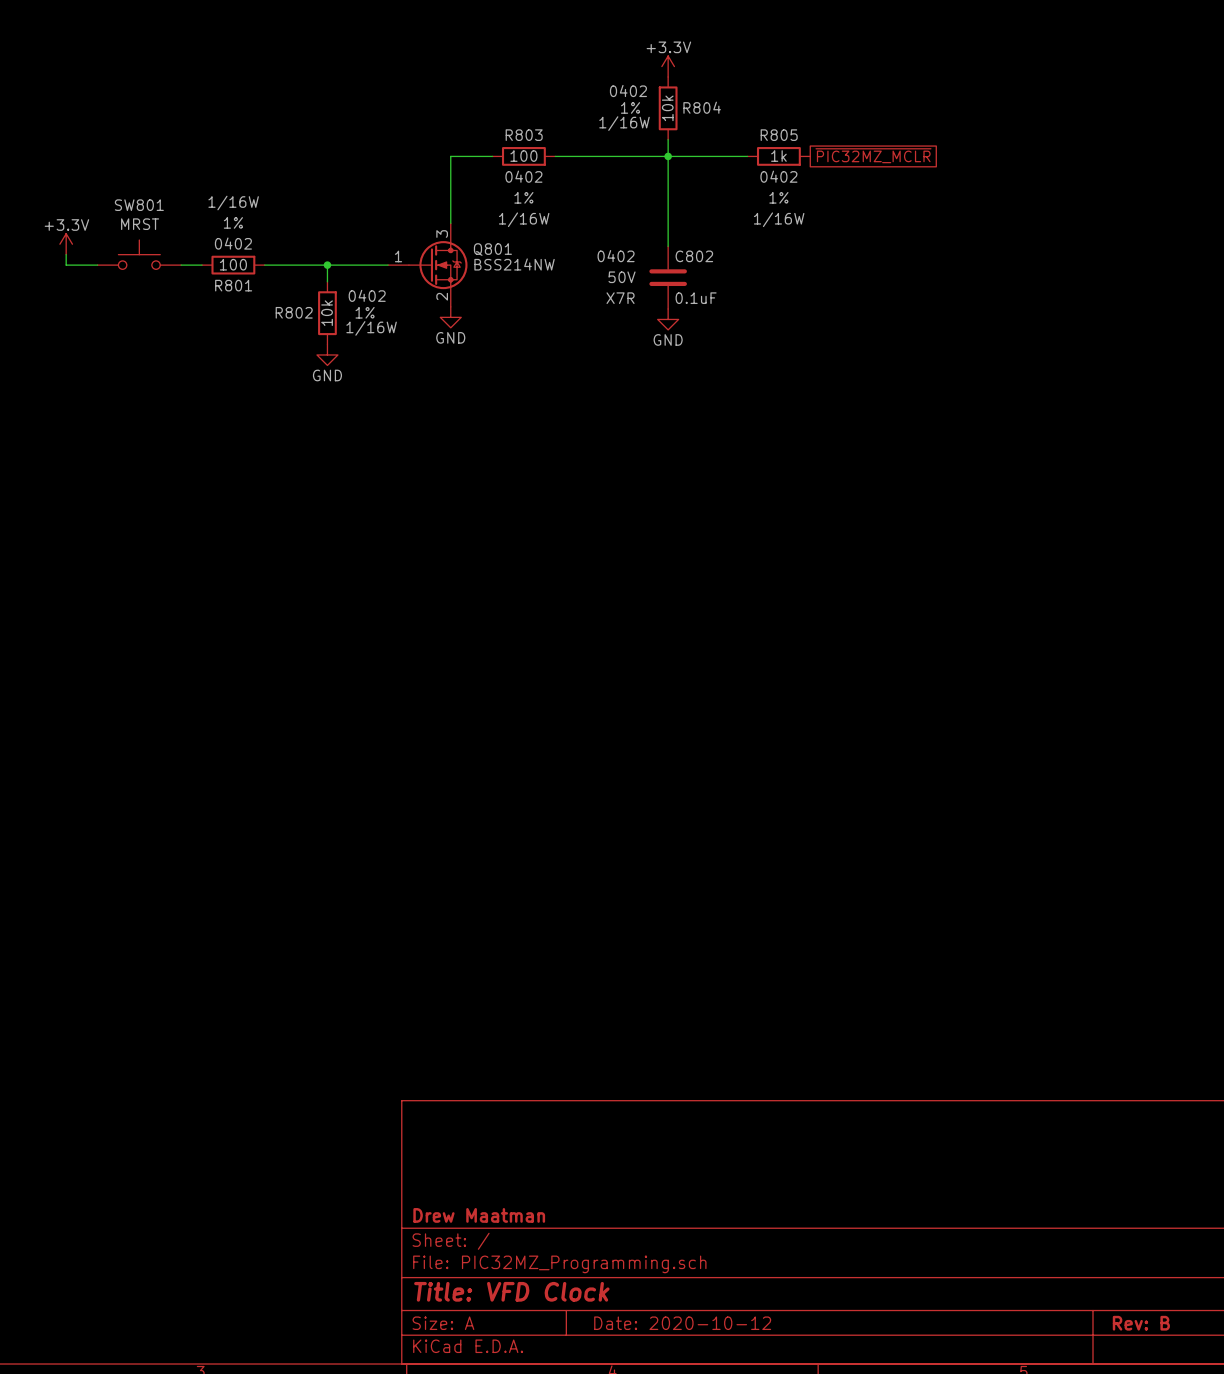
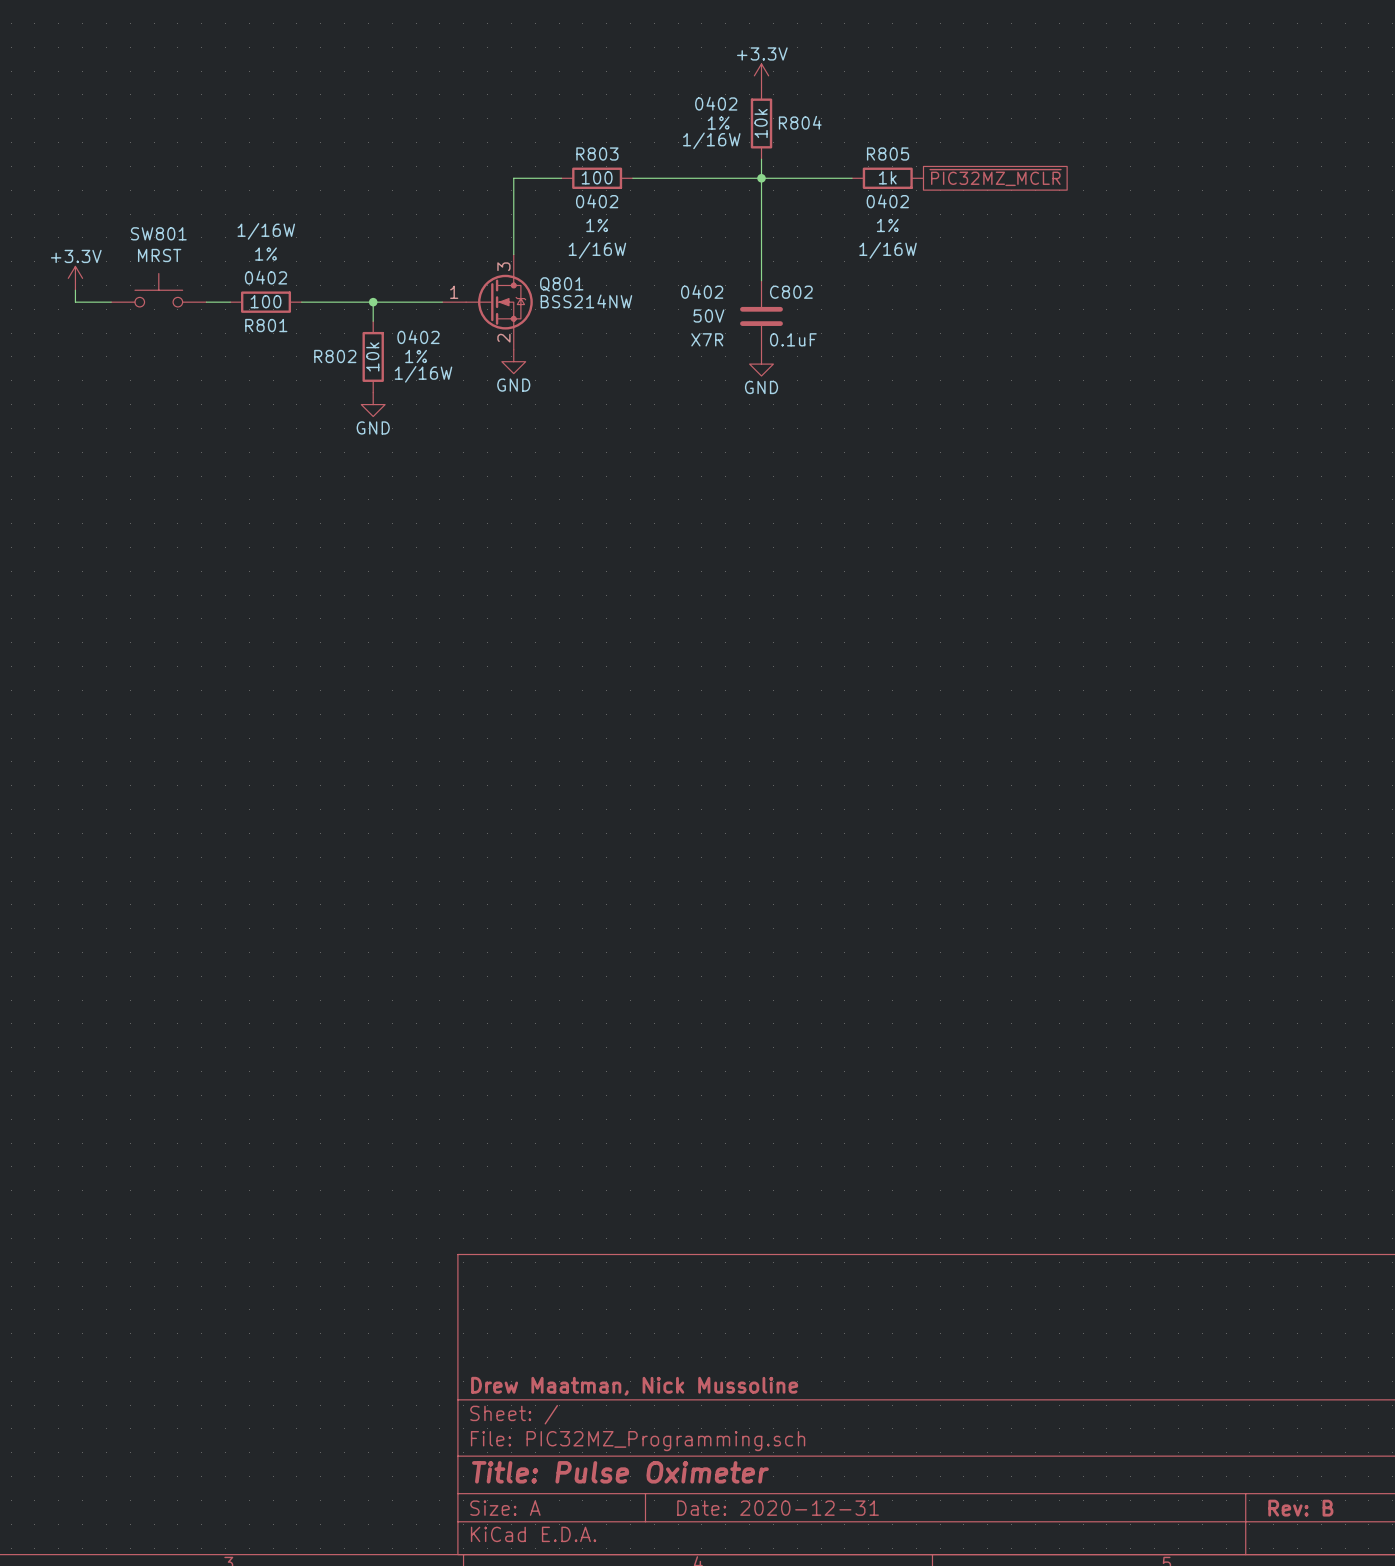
title block: Drew Maatman (479, 1215) -> Drew Maatman, Nick Mussoline (634, 1386)
title block: Title: VFD Clock (511, 1291) -> Title: Pulse Oximeter (620, 1472)
title block: Date: 2020-10-12 (682, 1323) -> Date: 2020-12-31 (778, 1508)

